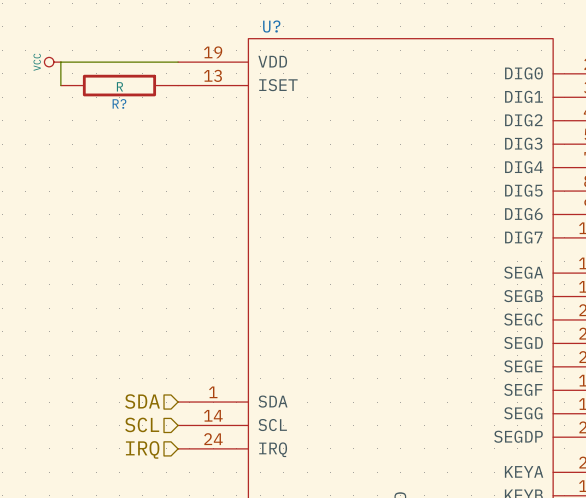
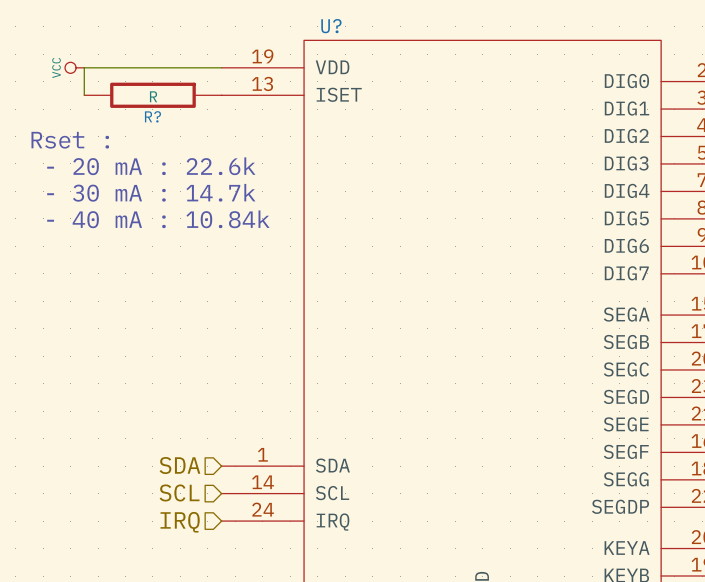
text: none -> Rset : (70, 140)
text: none -> - 20 mA : 22.6k (151, 166)
text: none -> - 30 mA : 14.7k (151, 192)
text: none -> - 40 mA : 10.84k (158, 219)

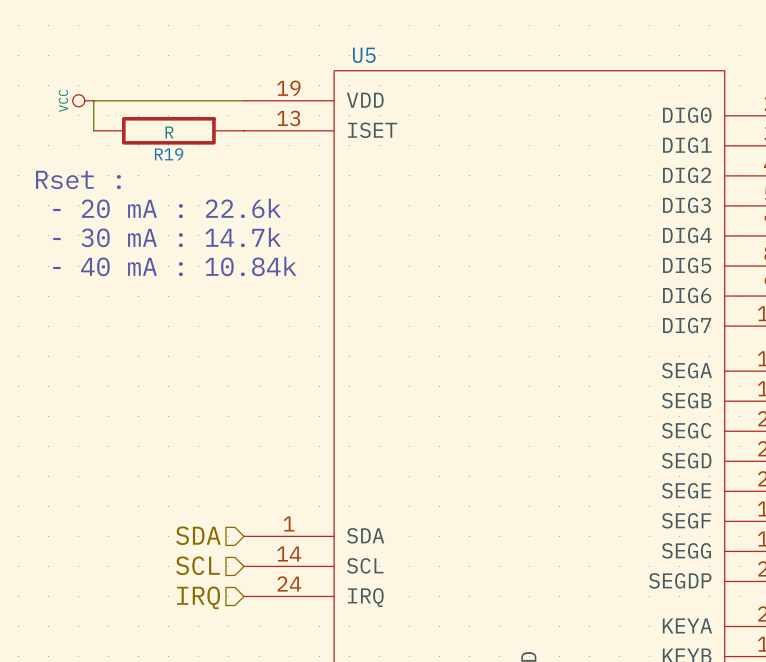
U? name: U? (331, 26) -> U5 (364, 55)
R? name: R? (152, 116) -> R19 (169, 154)

